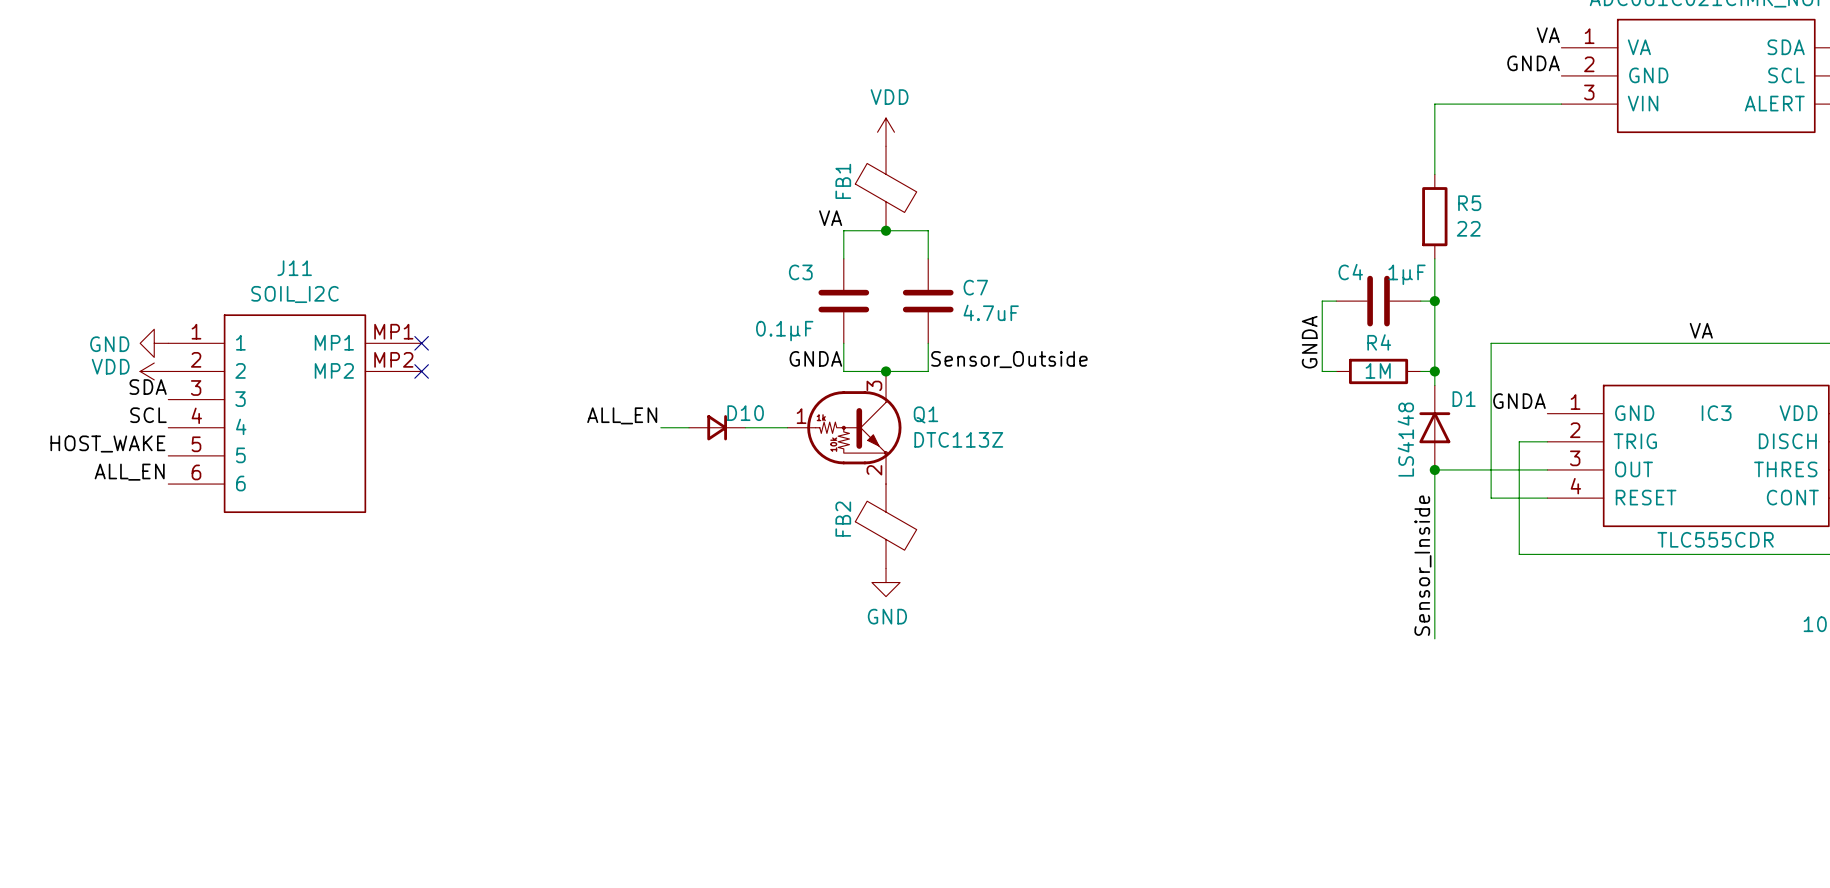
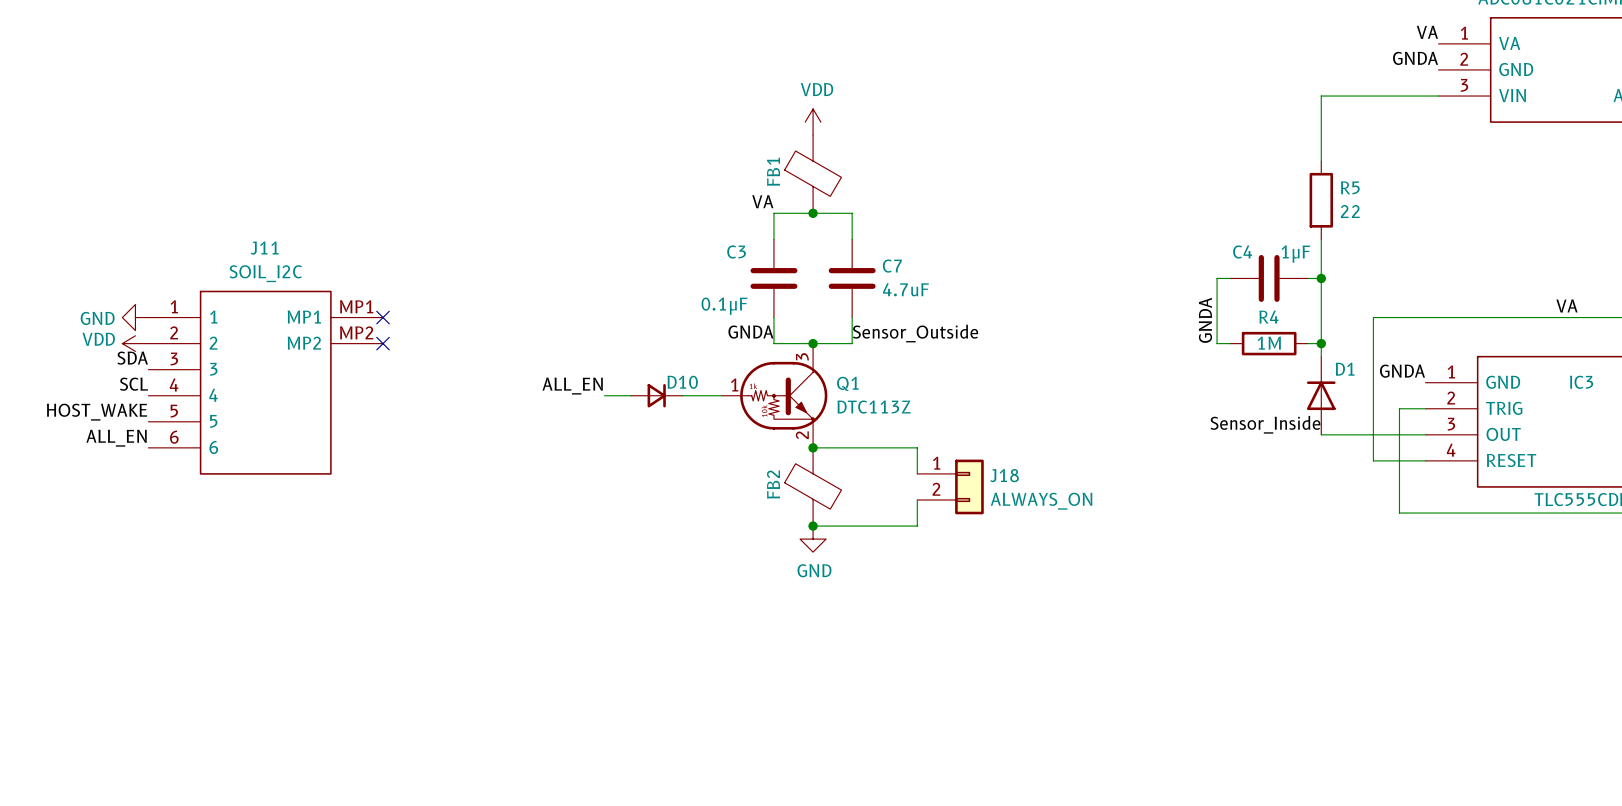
D1 value: LS4148 (1405, 439) -> none
wire: (1434, 469) (1434, 638) -> none
junction: (1434, 469) -> none
wire: none -> (813, 447) (917, 447) (917, 473)
junction: none -> (813, 447)
J18: none -> ALWAYS_ON (950, 486)
wire: none -> (917, 499) (917, 526) (813, 526)
label rotation: 0° (1422, 565) -> 90° clockwise (1265, 424)
junction: none -> (813, 526)

